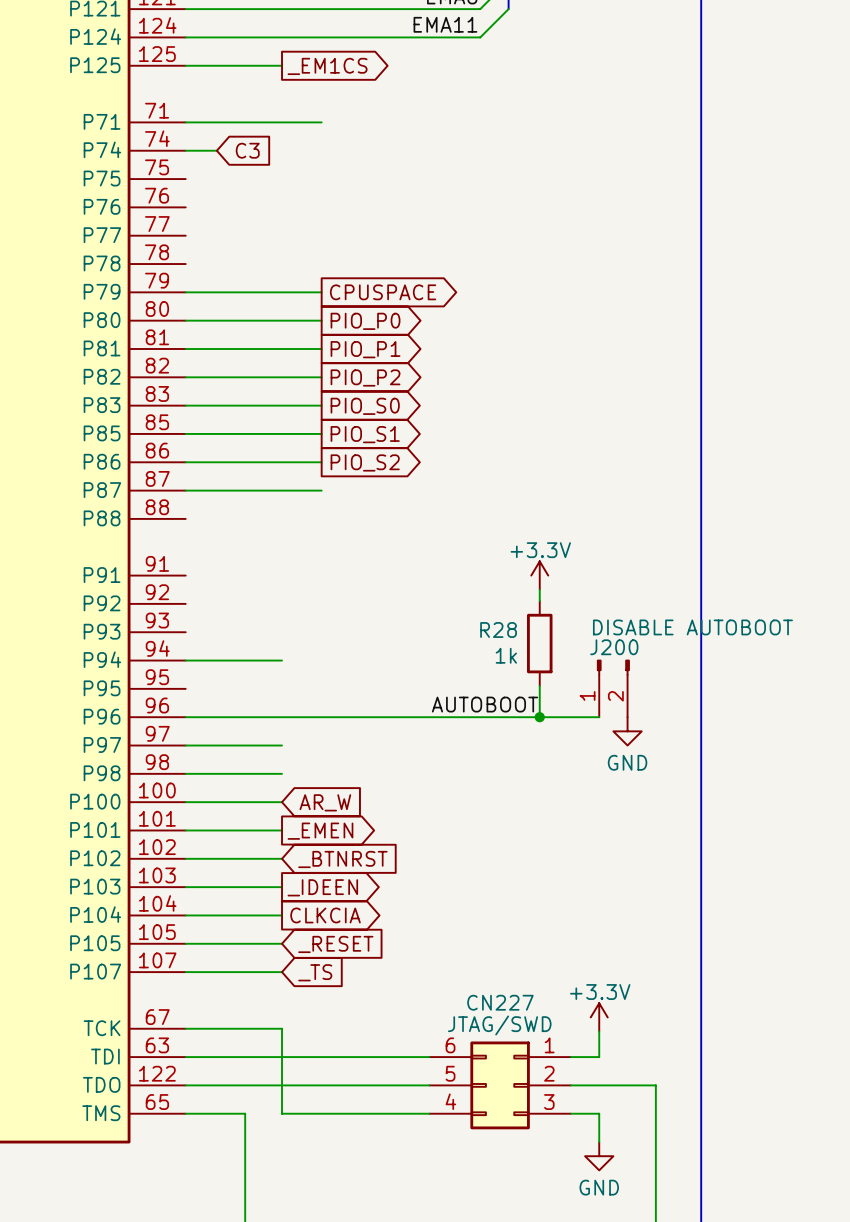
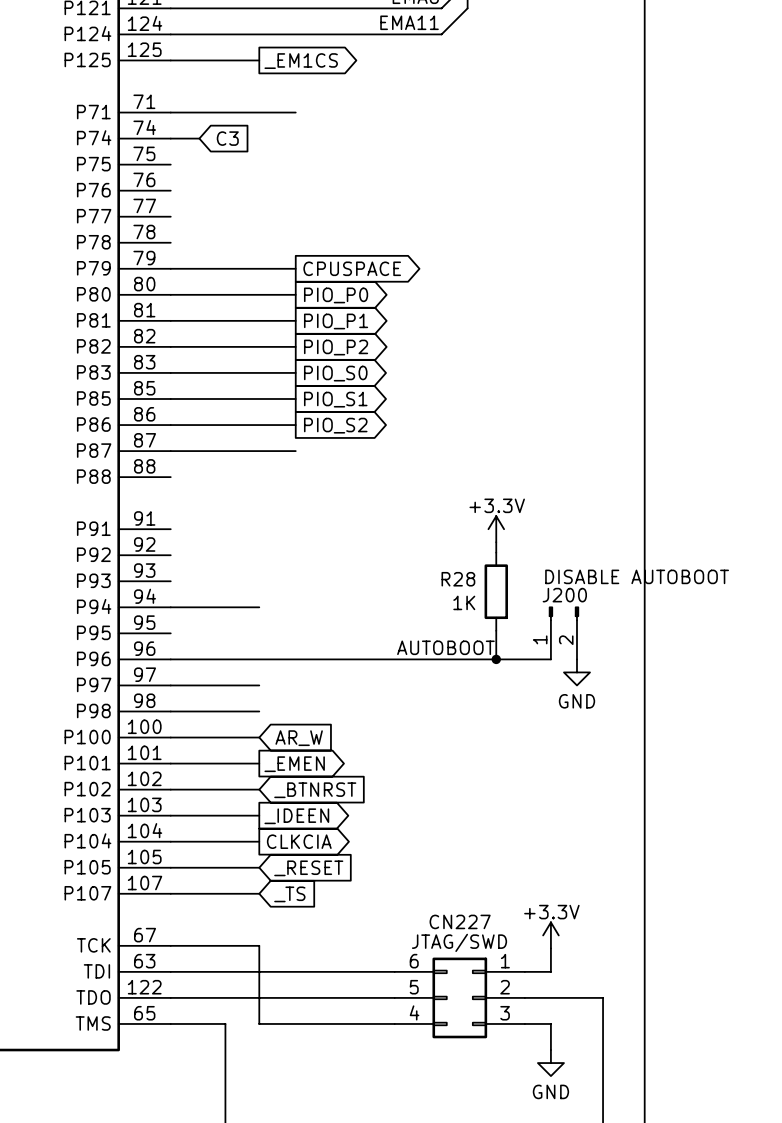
R28 value: 1k (506, 655) -> 1K (464, 602)

